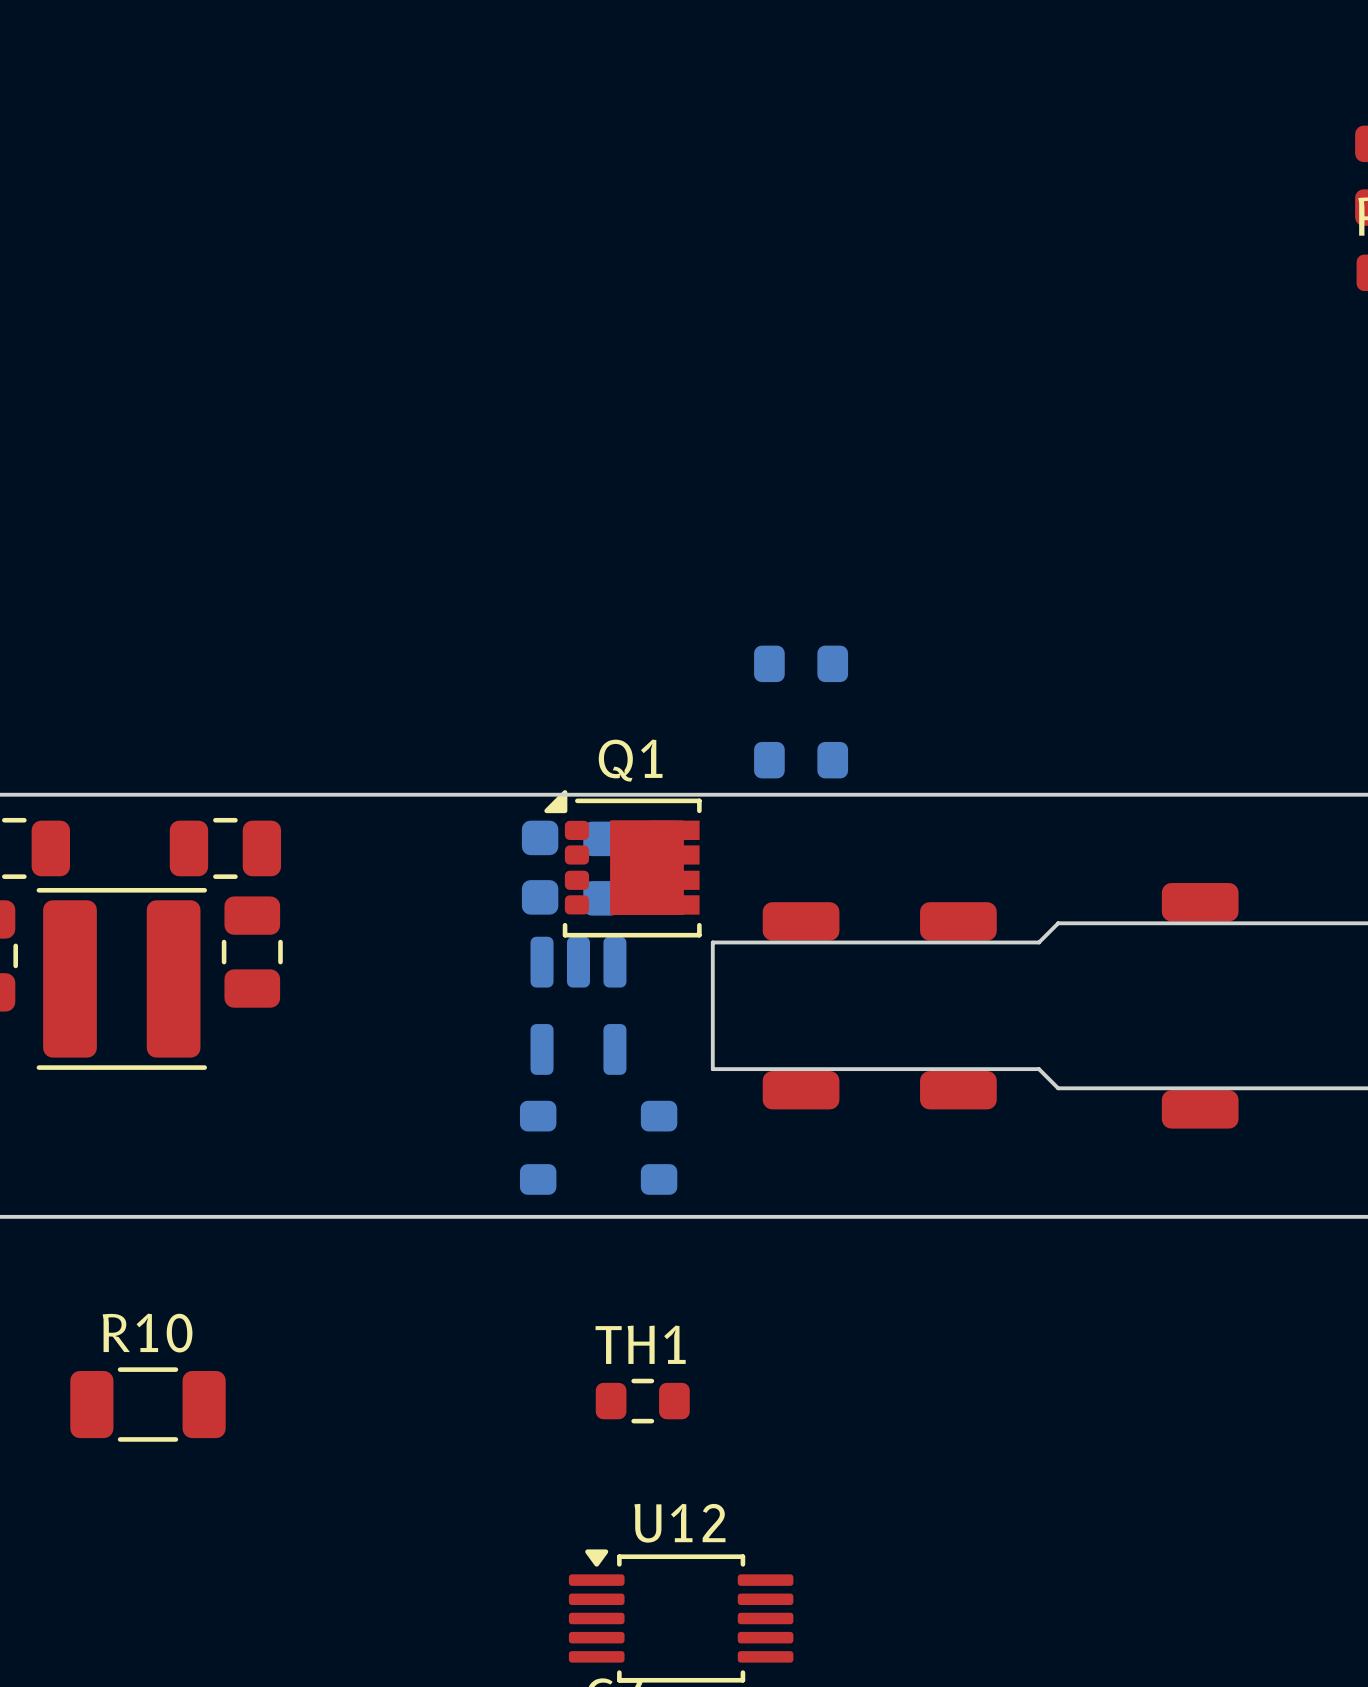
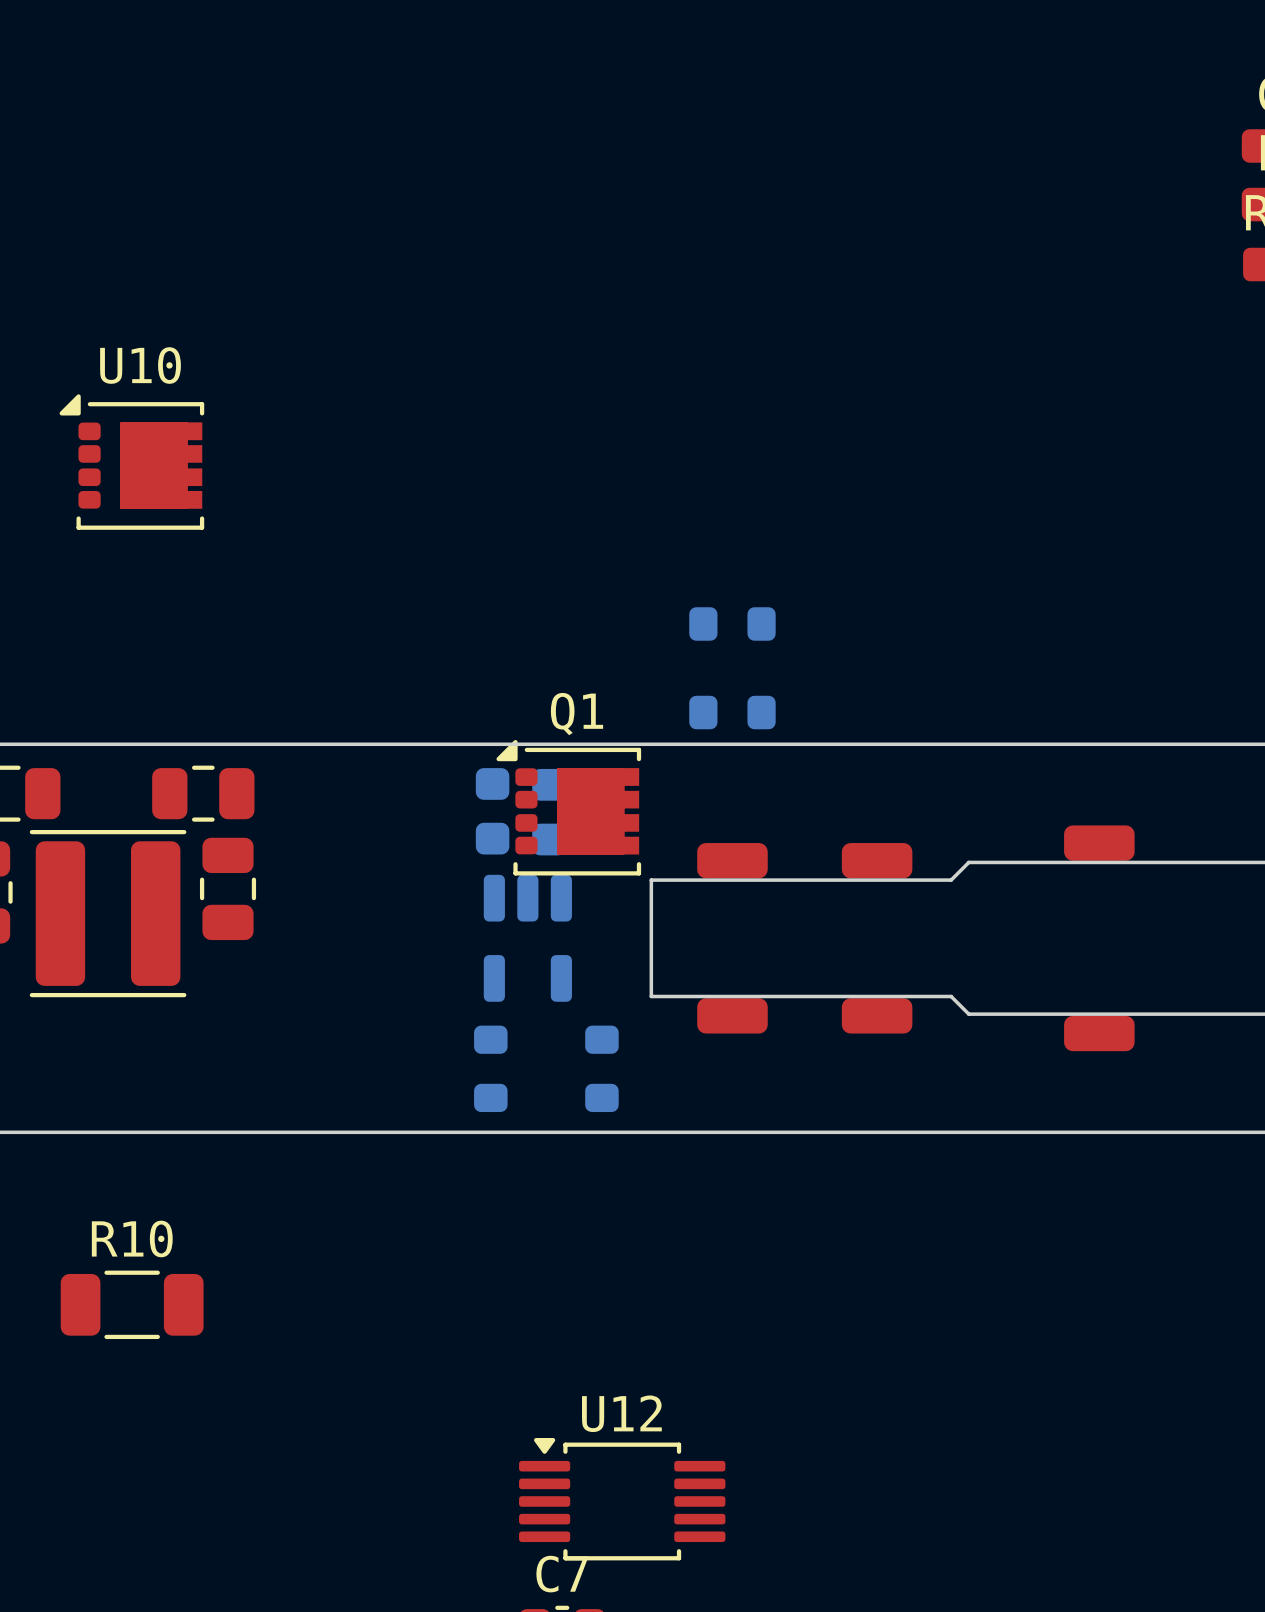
U10: none -> (131, 462)
TH1: (642, 1401) -> none

